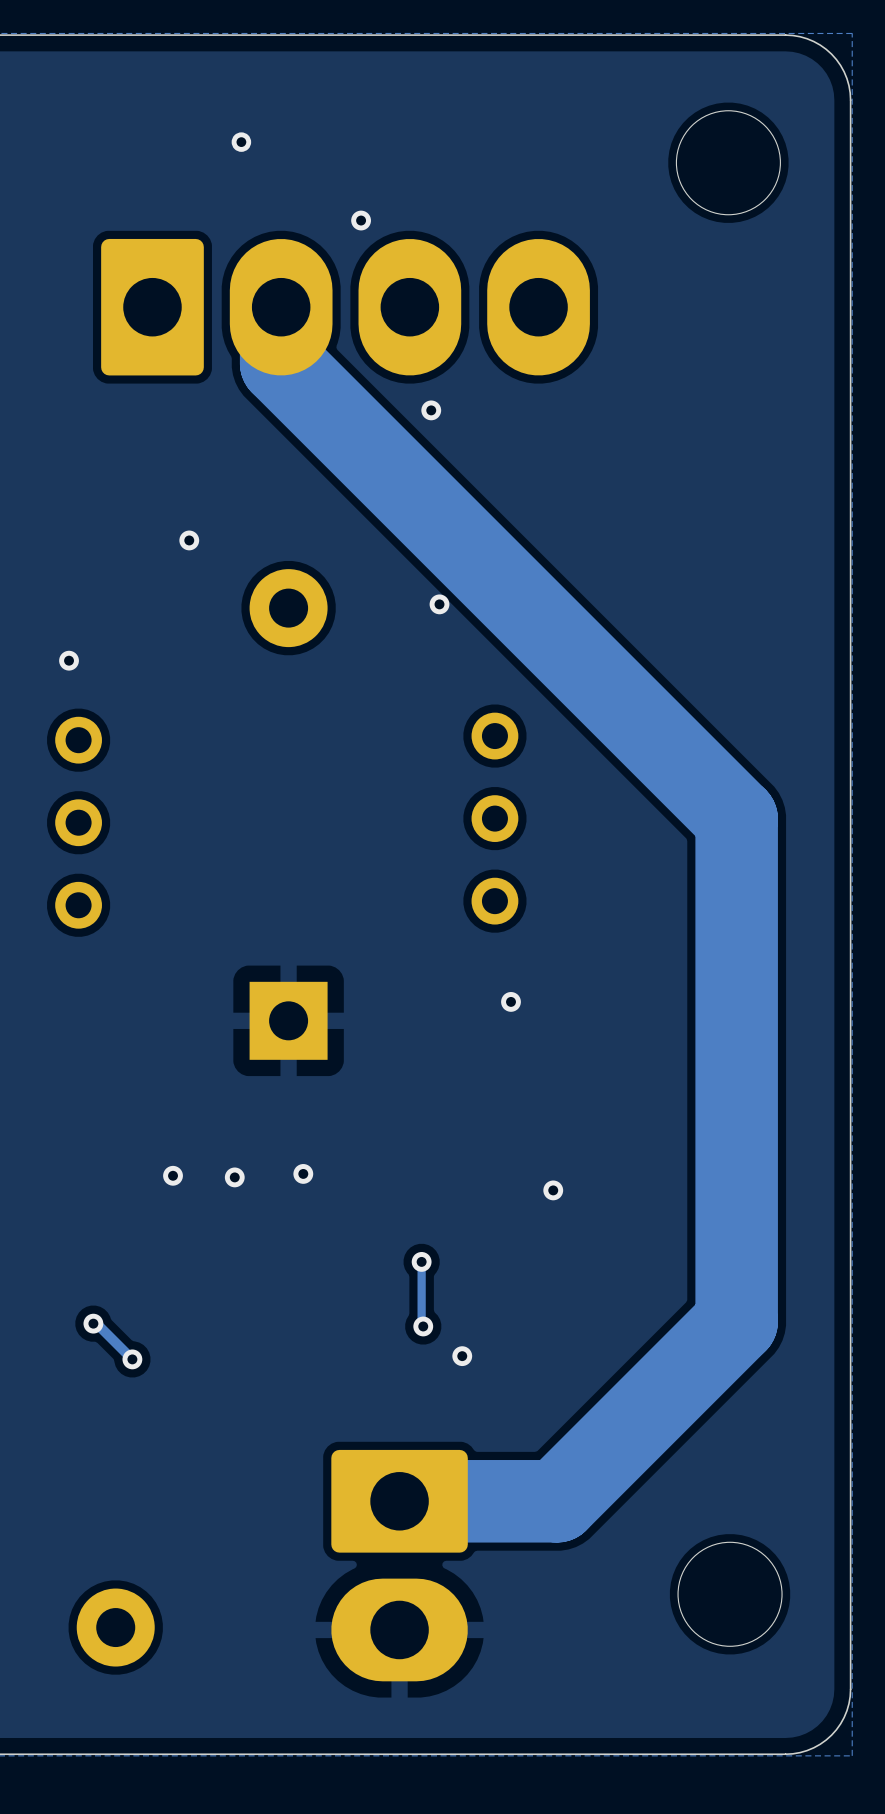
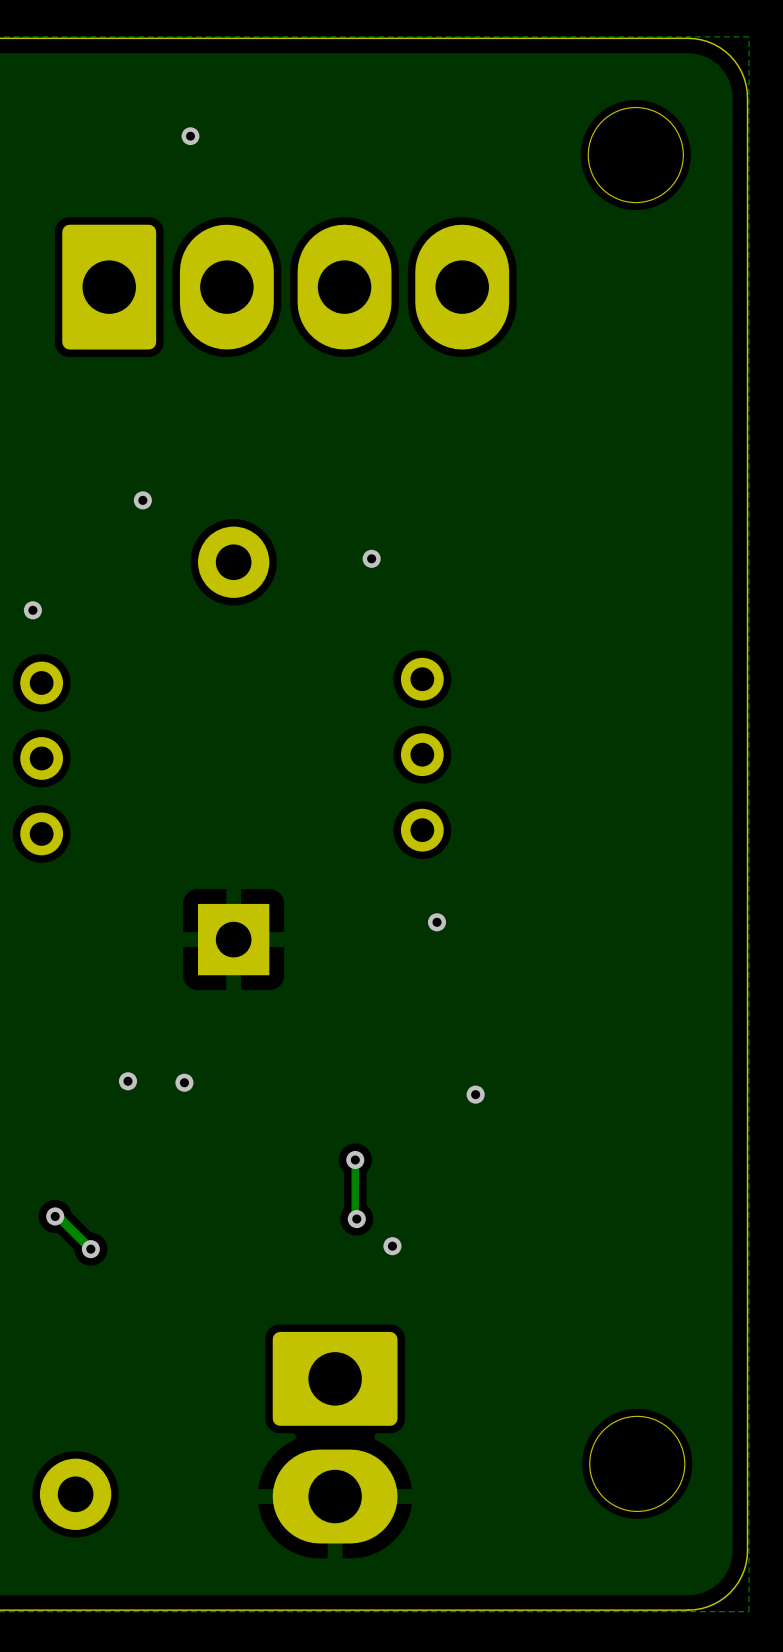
via: (361, 220) -> none
track: (281, 307) (281, 363) (736, 818) (736, 1321) (557, 1501) (399, 1501) -> none
via: (431, 410) -> none
via: (303, 1173) -> none

